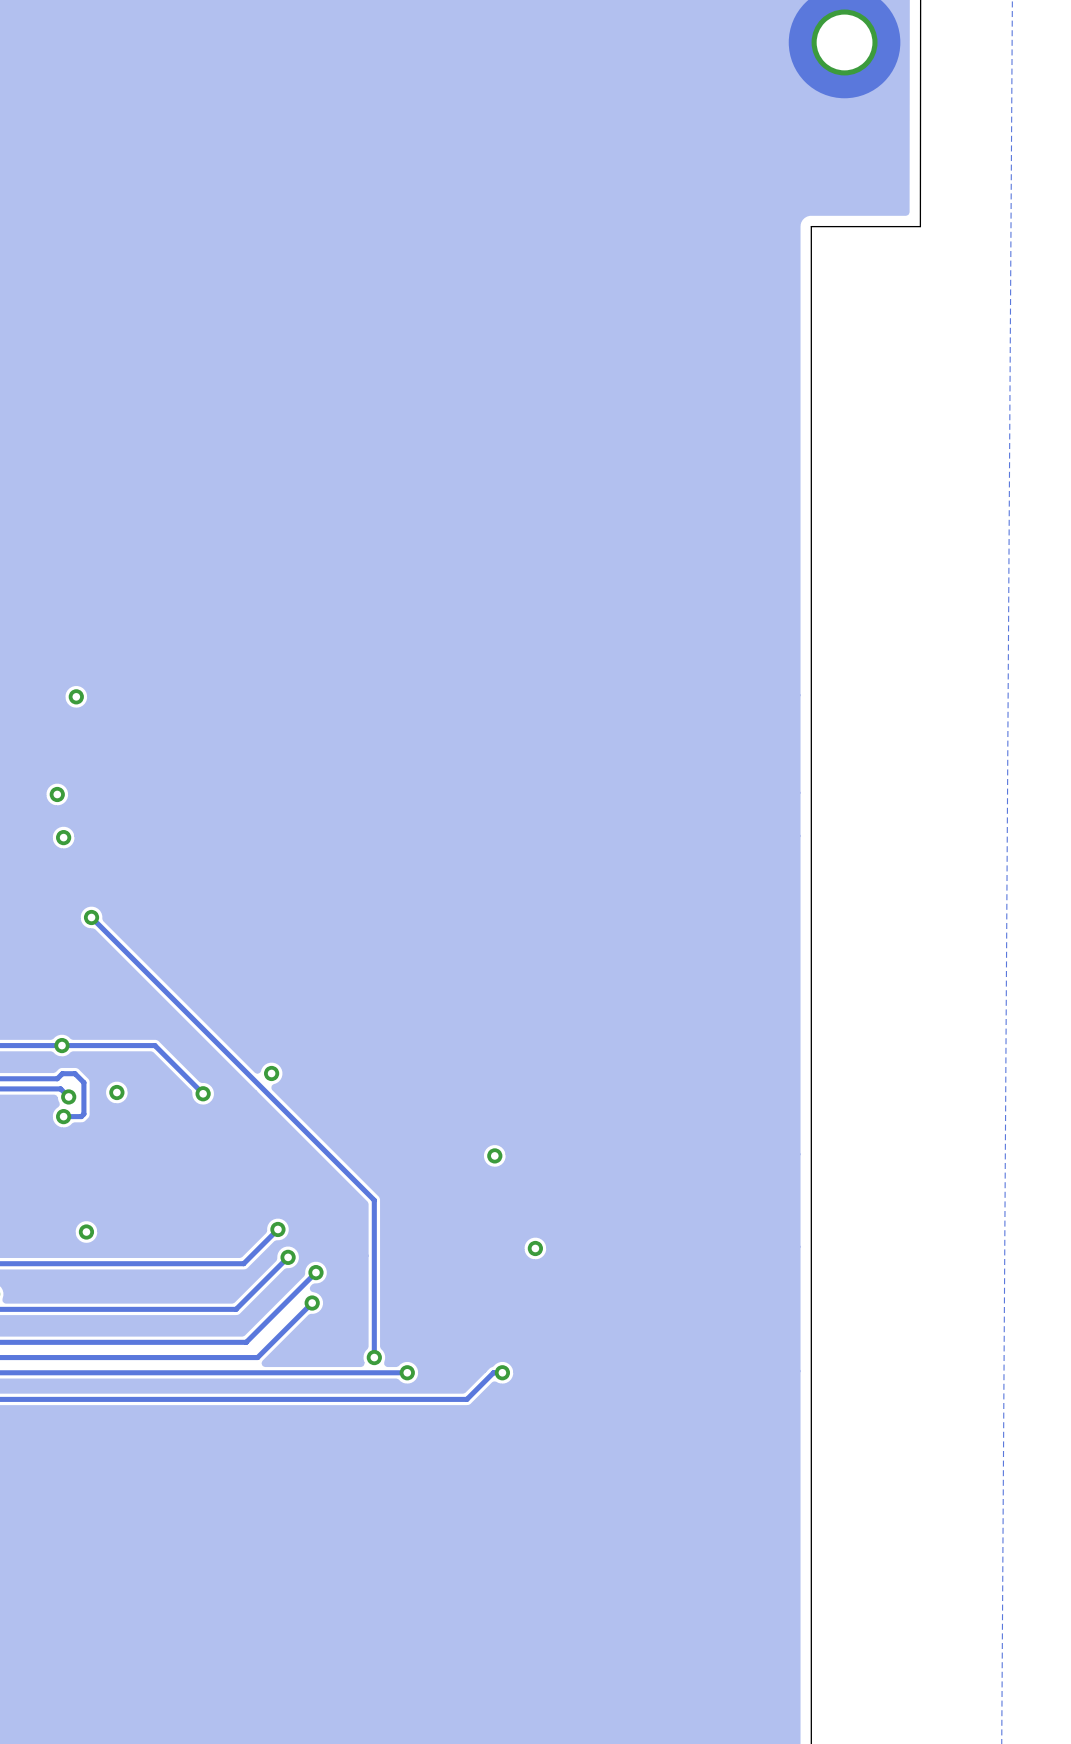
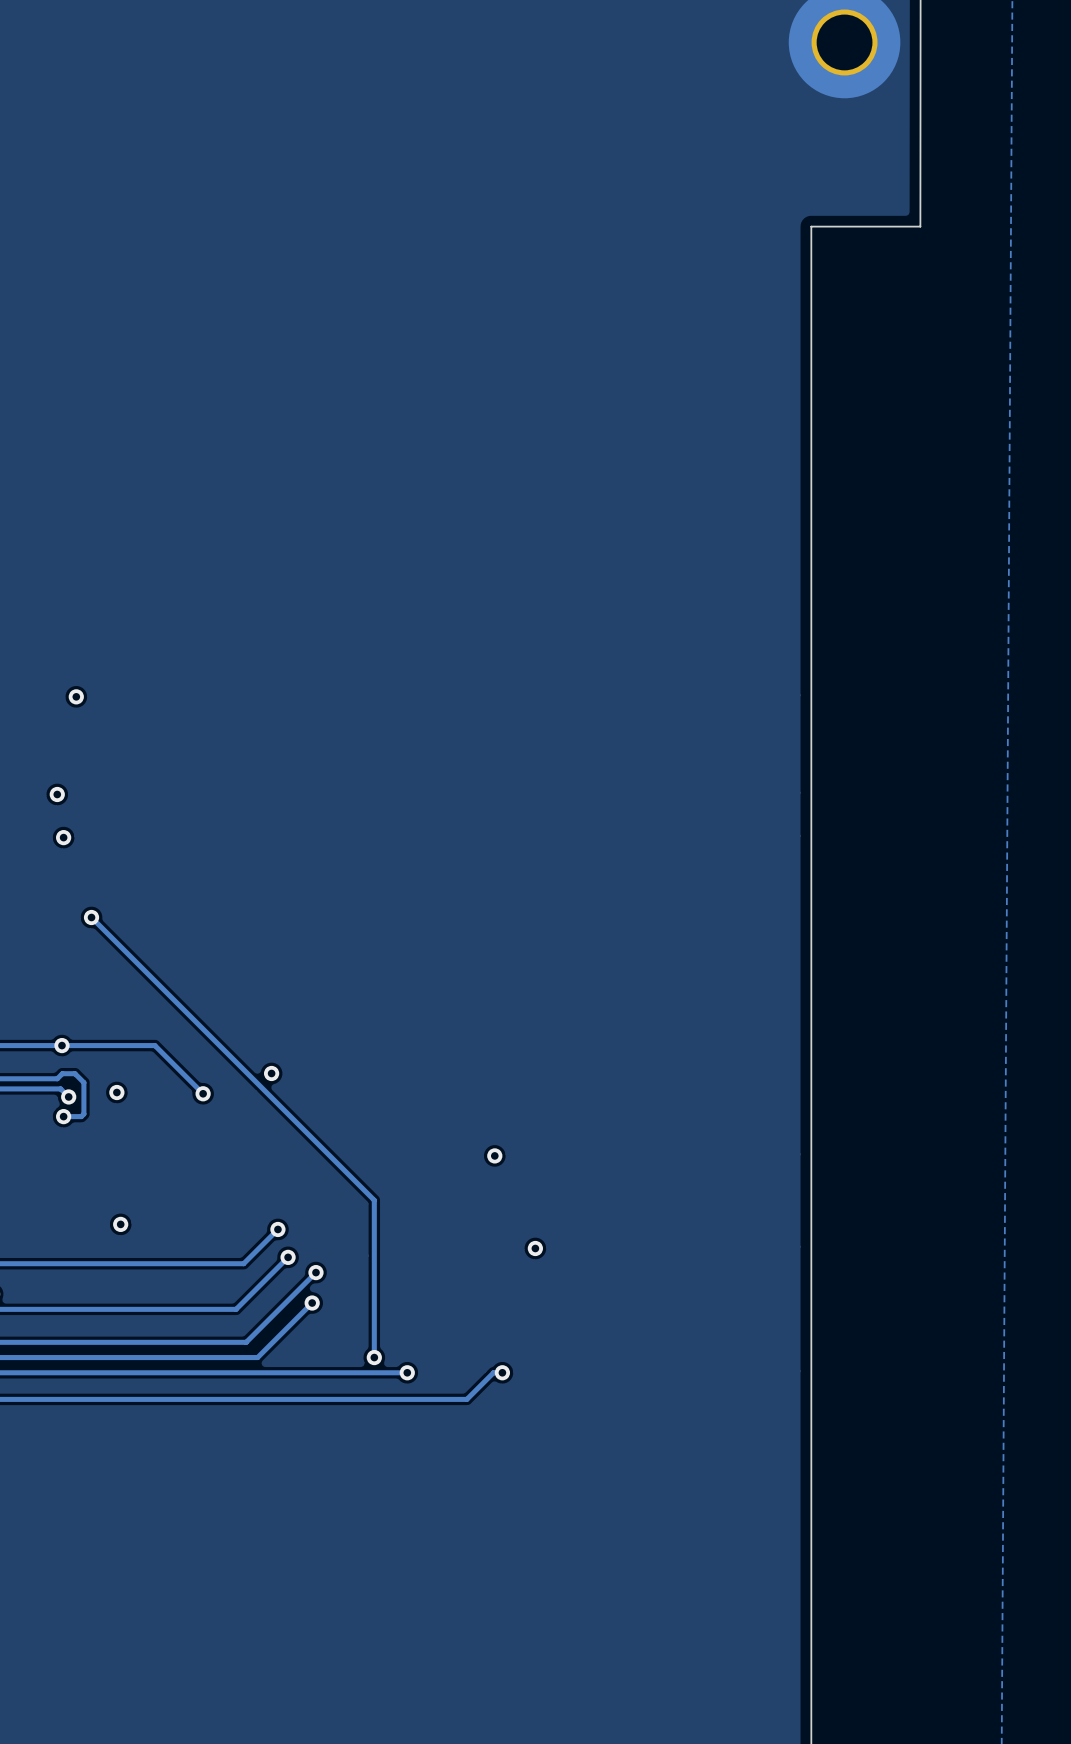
via position: (86, 1232) -> (120, 1224)

